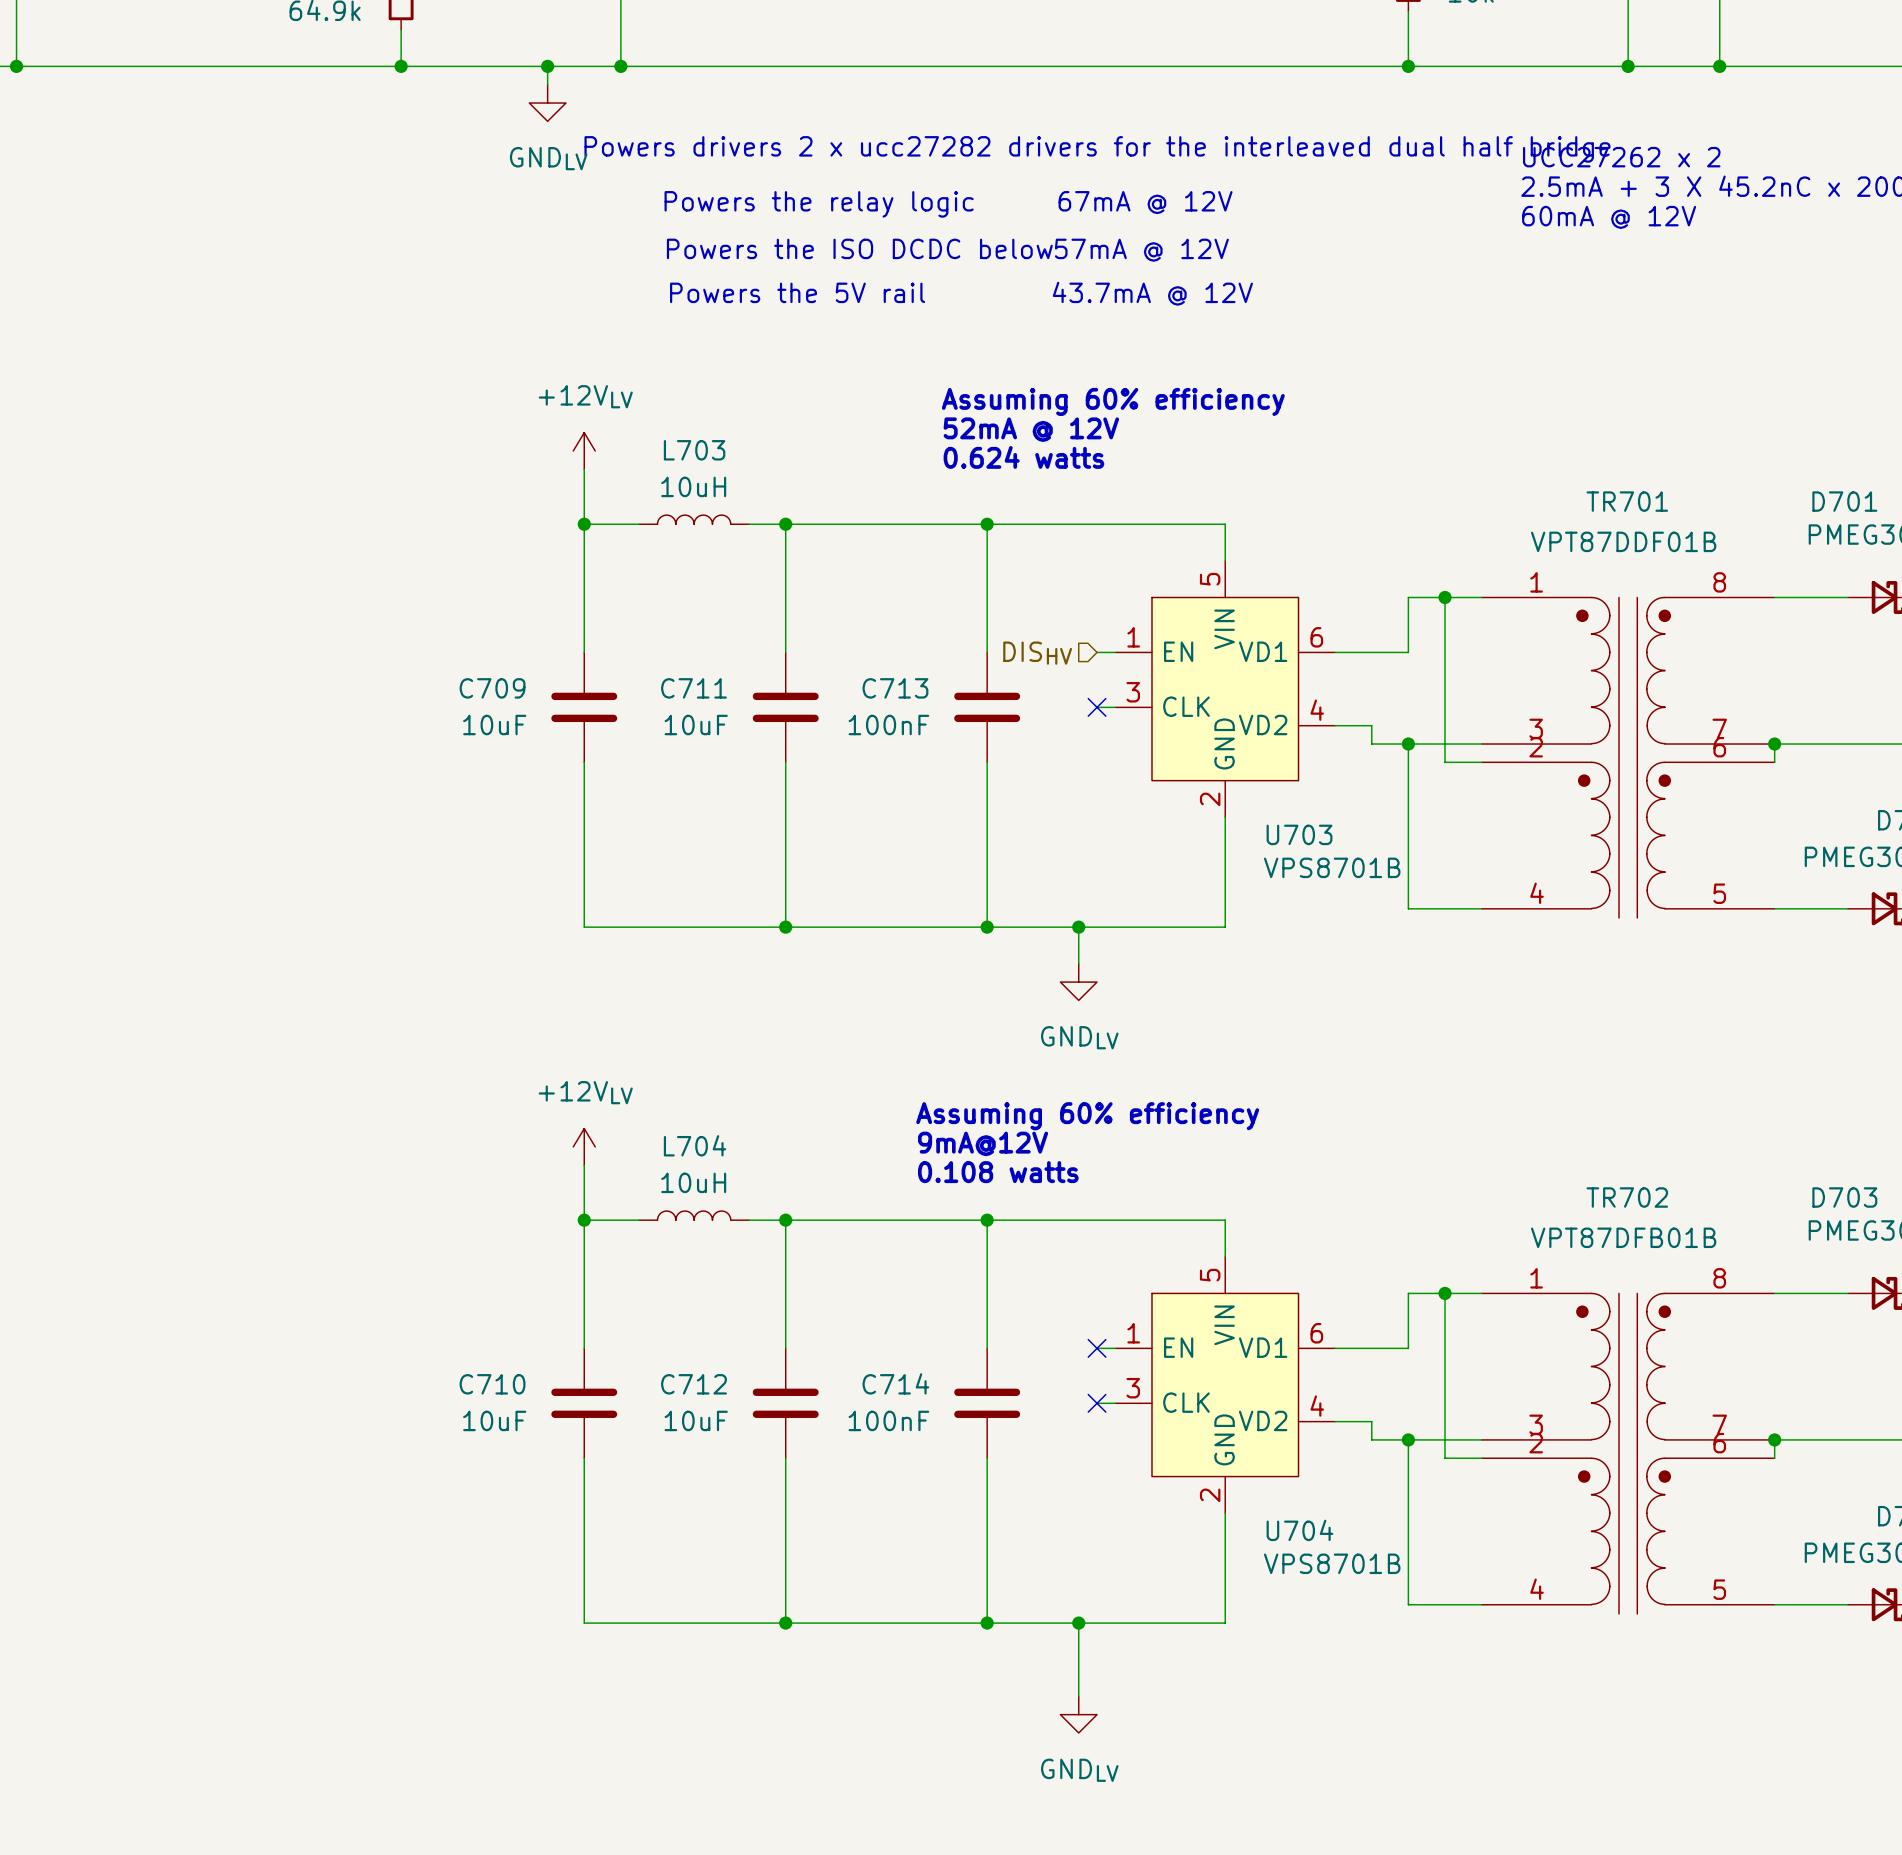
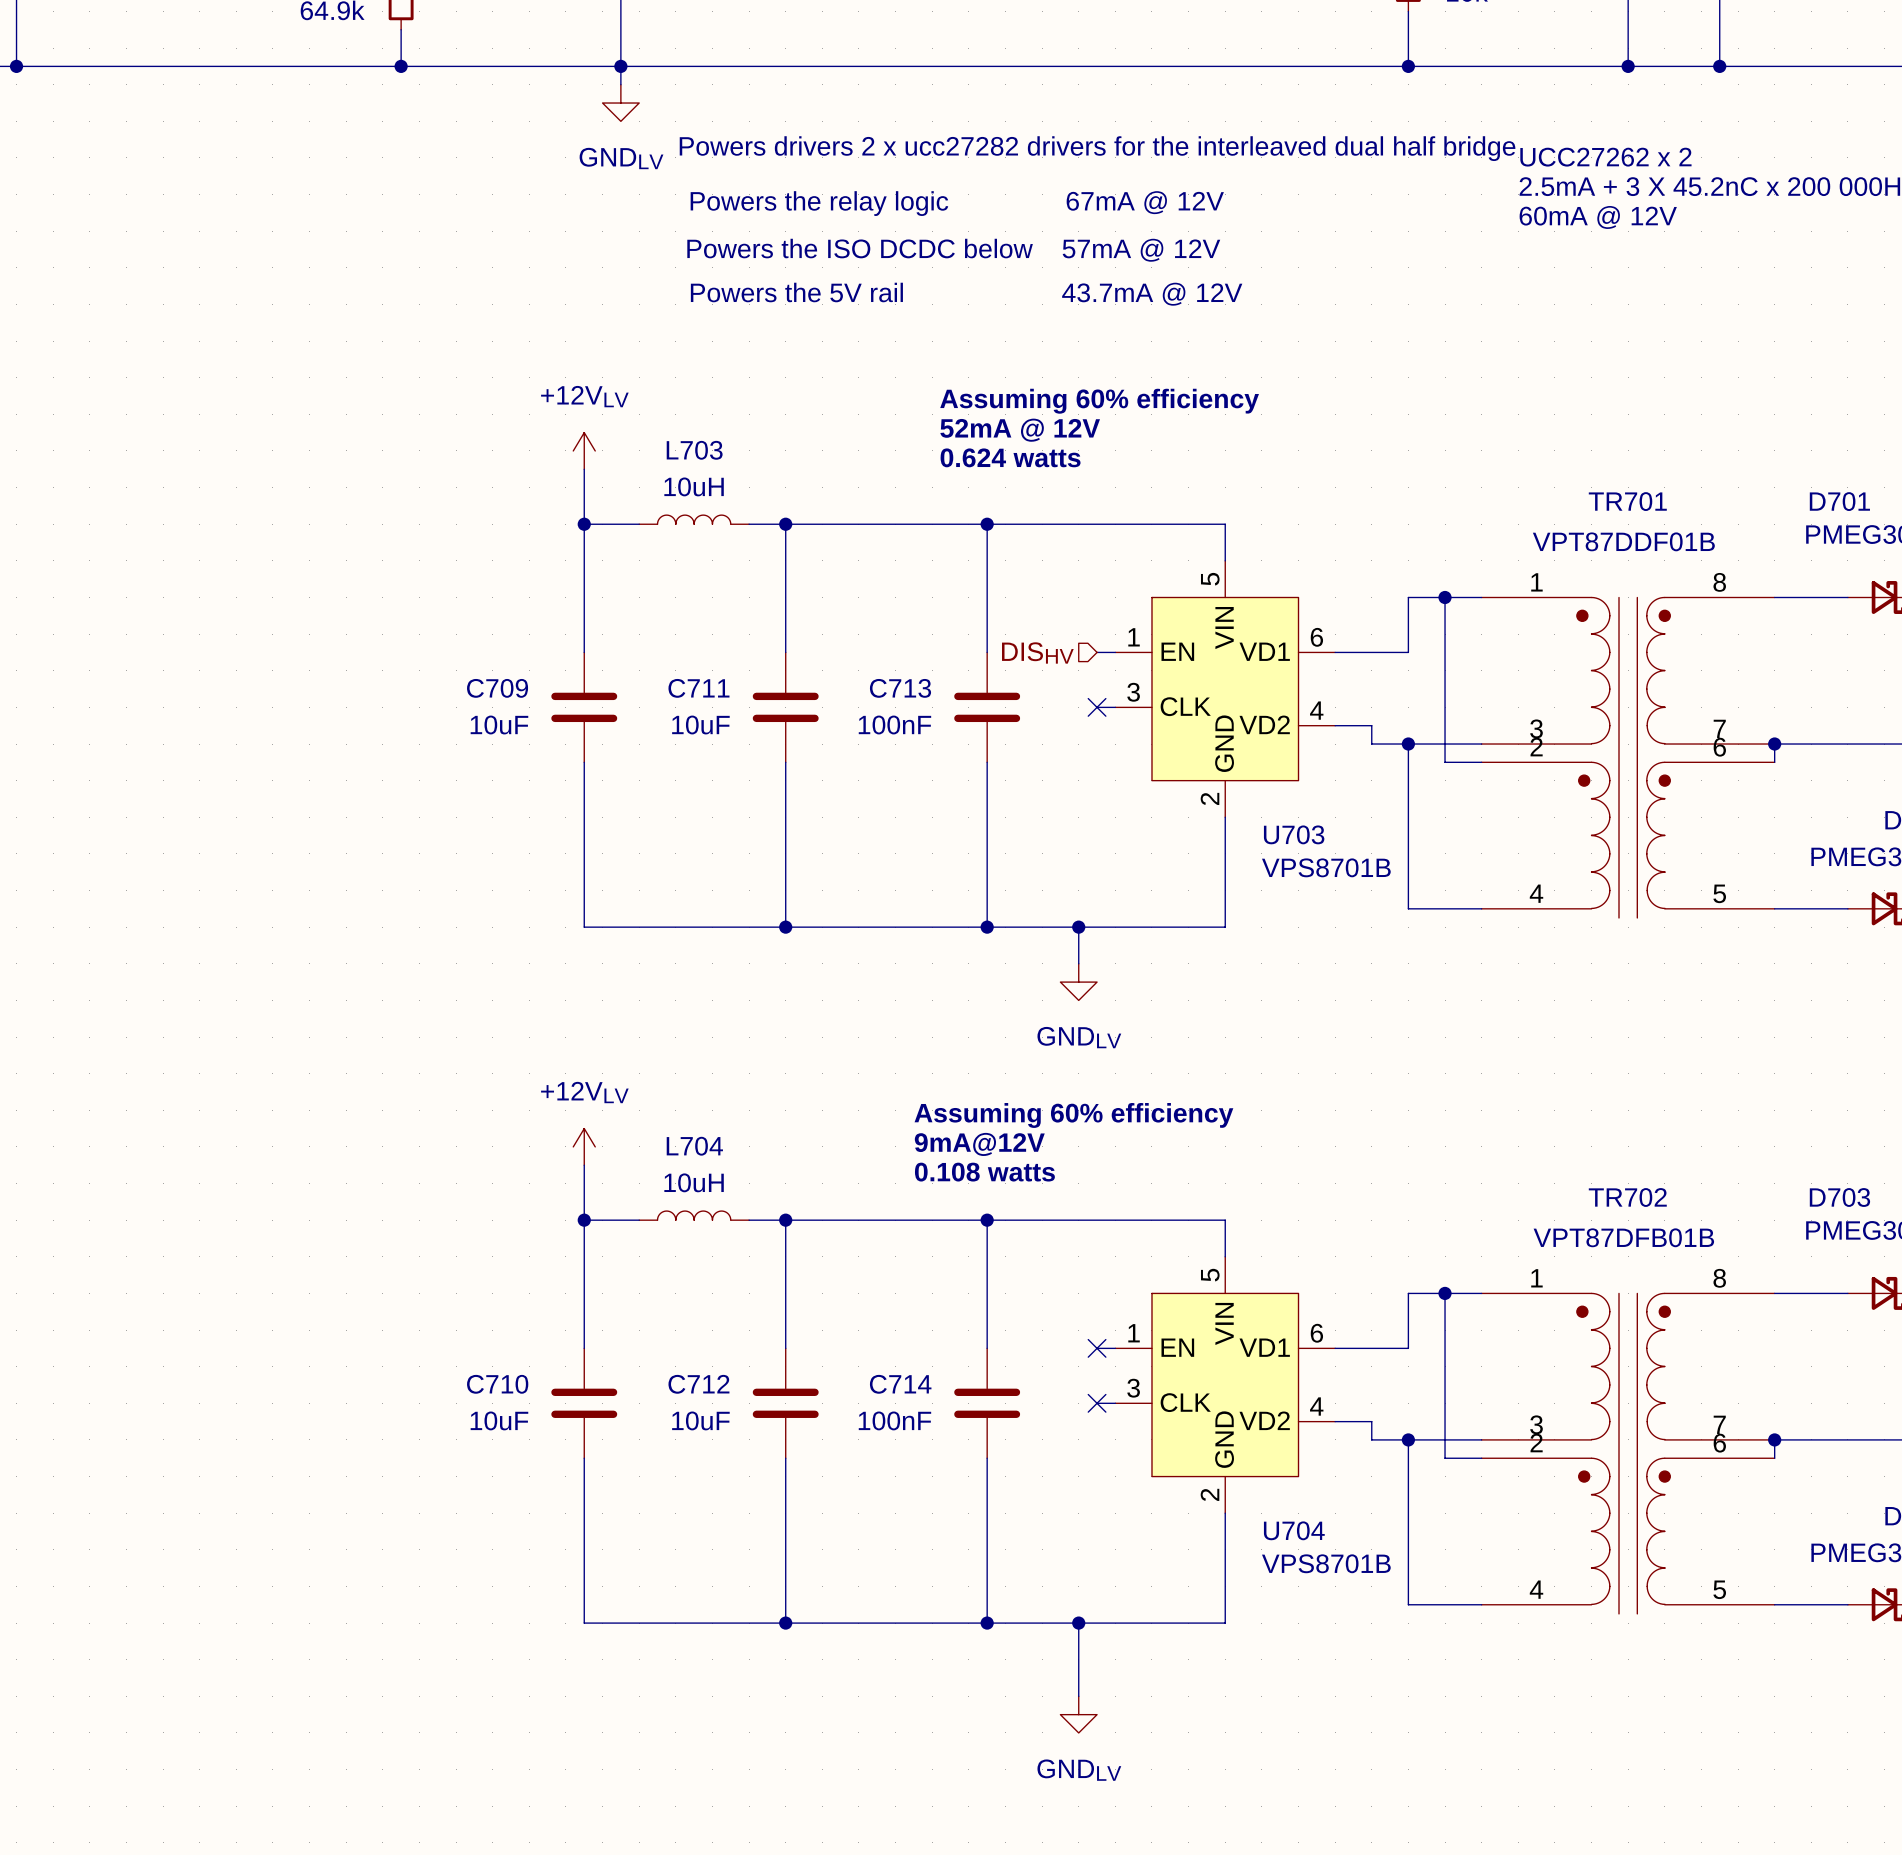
wire: (547, 66) (547, 84) -> (620, 66) (620, 84)
junction: (547, 66) -> none
power symbol position: GNDLV (547, 103) -> GNDLV (620, 103)

